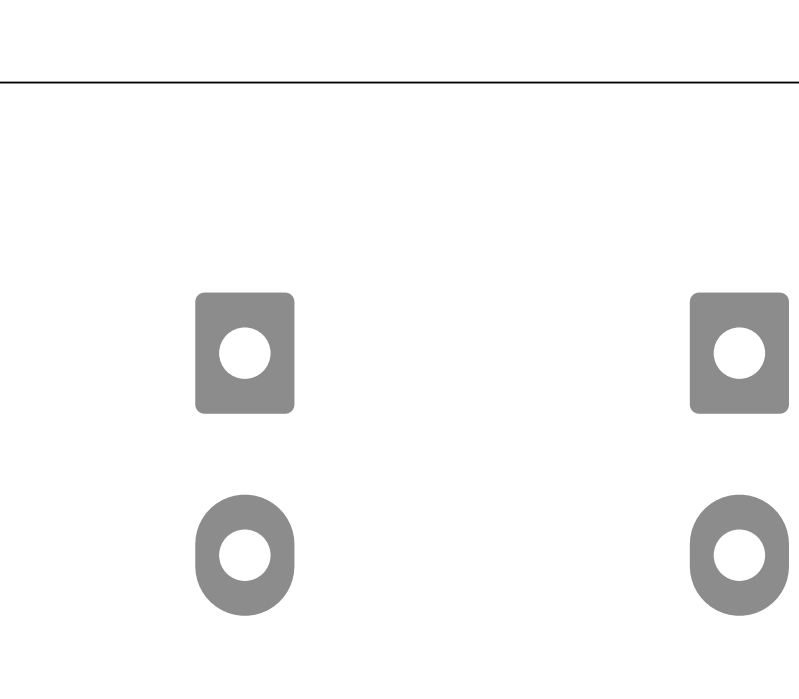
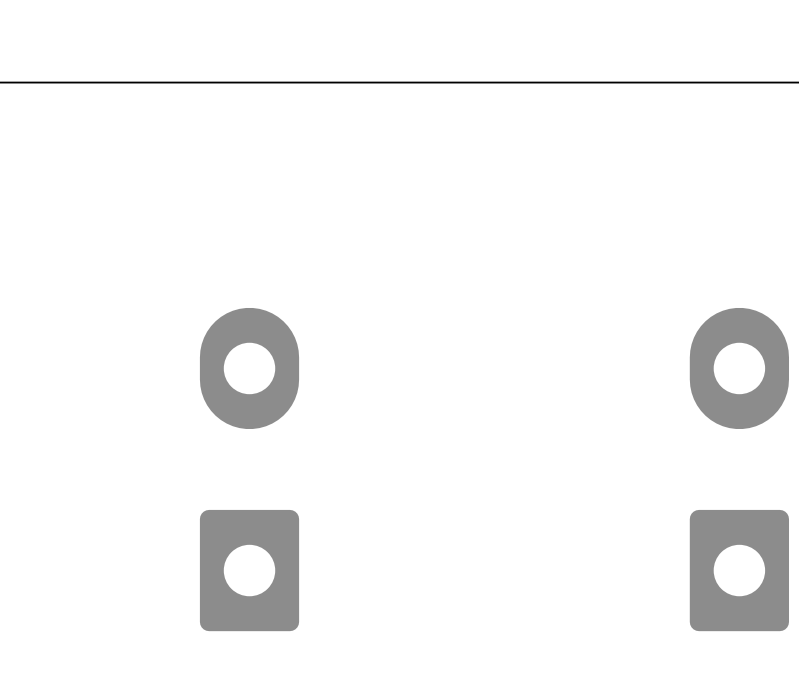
part rotation: 0° (244, 454) -> 180° (249, 469)
part rotation: 0° (739, 454) -> 180° (739, 469)

